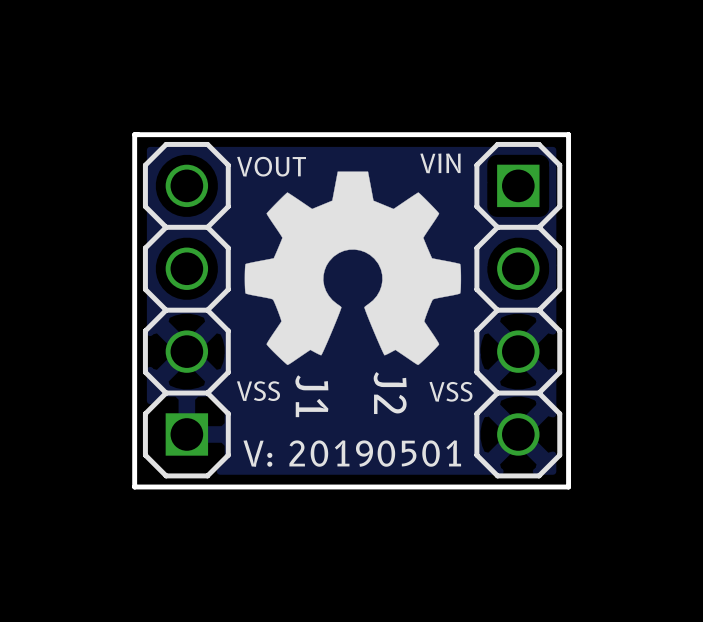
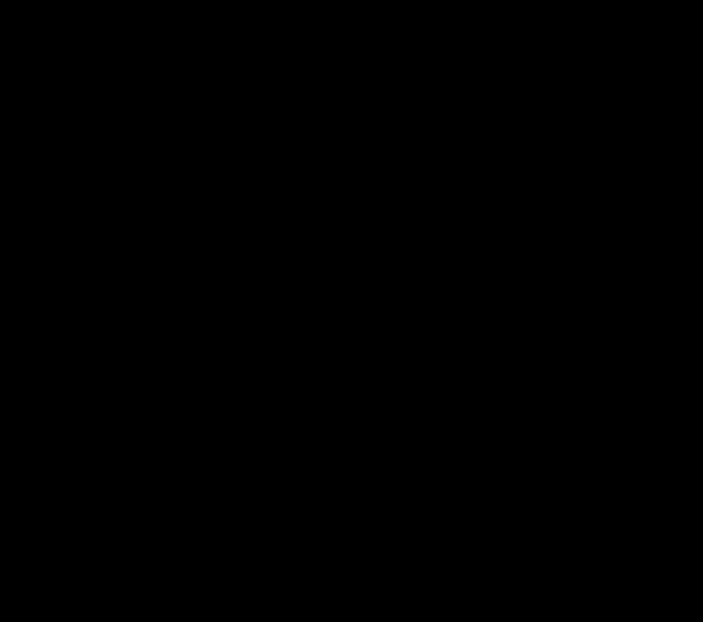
board edge: (568, 134) (568, 487) (134, 487) (134, 134) (568, 134) -> none
drawing: [244, 171, 462, 366] -> none
J1: (186, 310) -> none
J2: (518, 310) -> none
drawing: [243, 440, 462, 467] -> none

